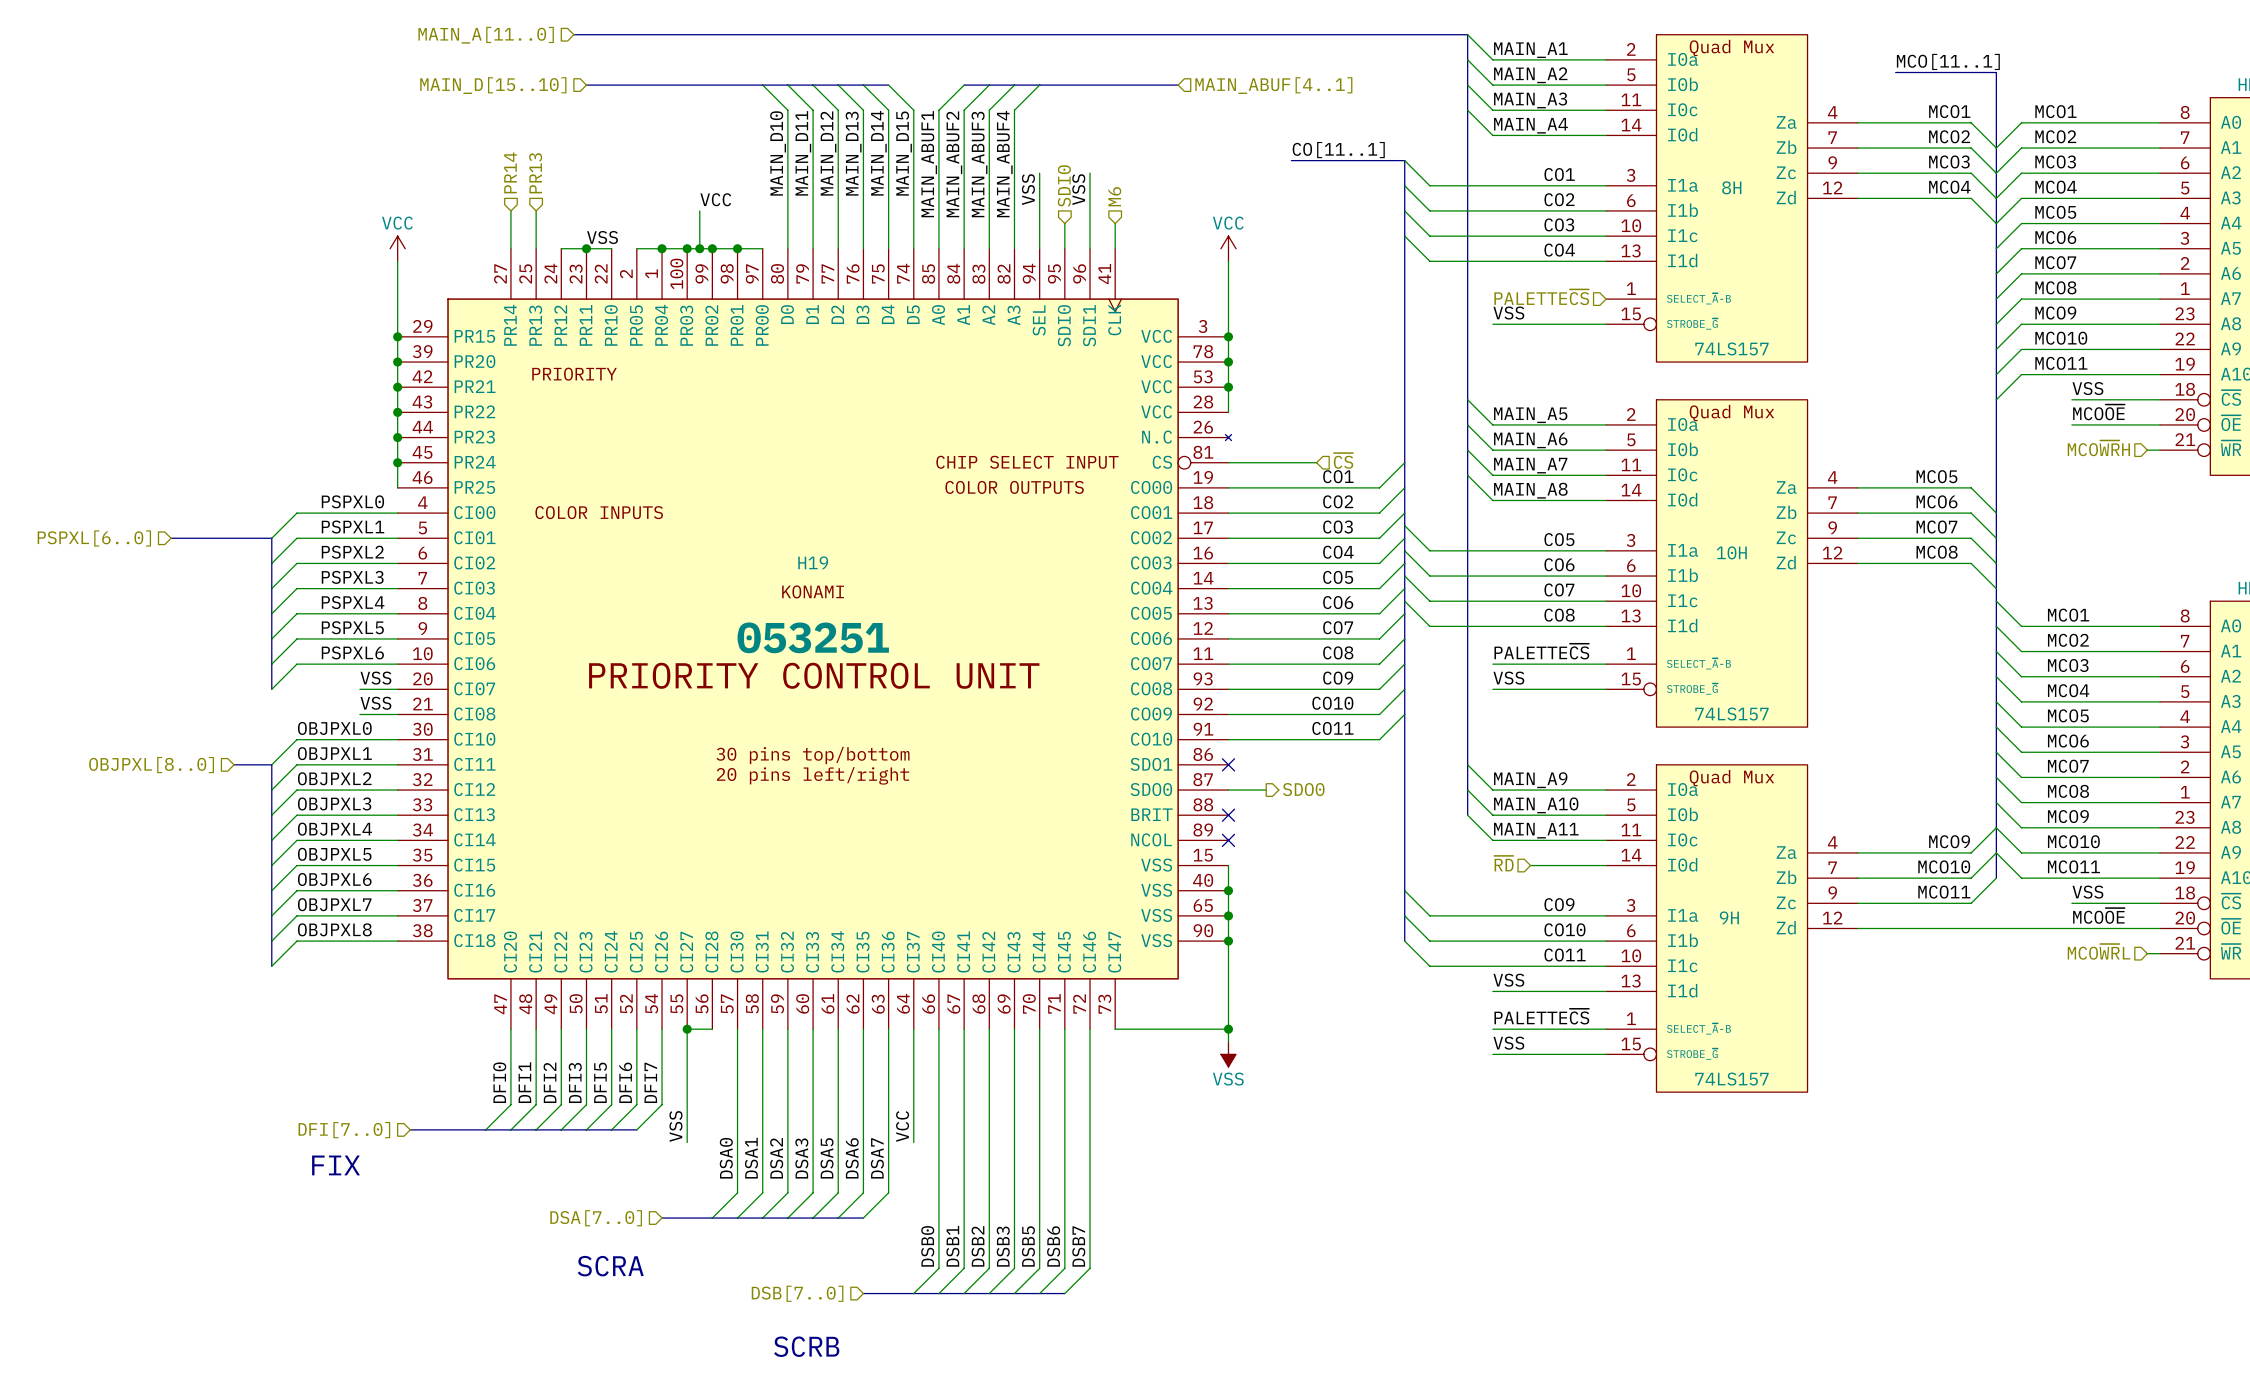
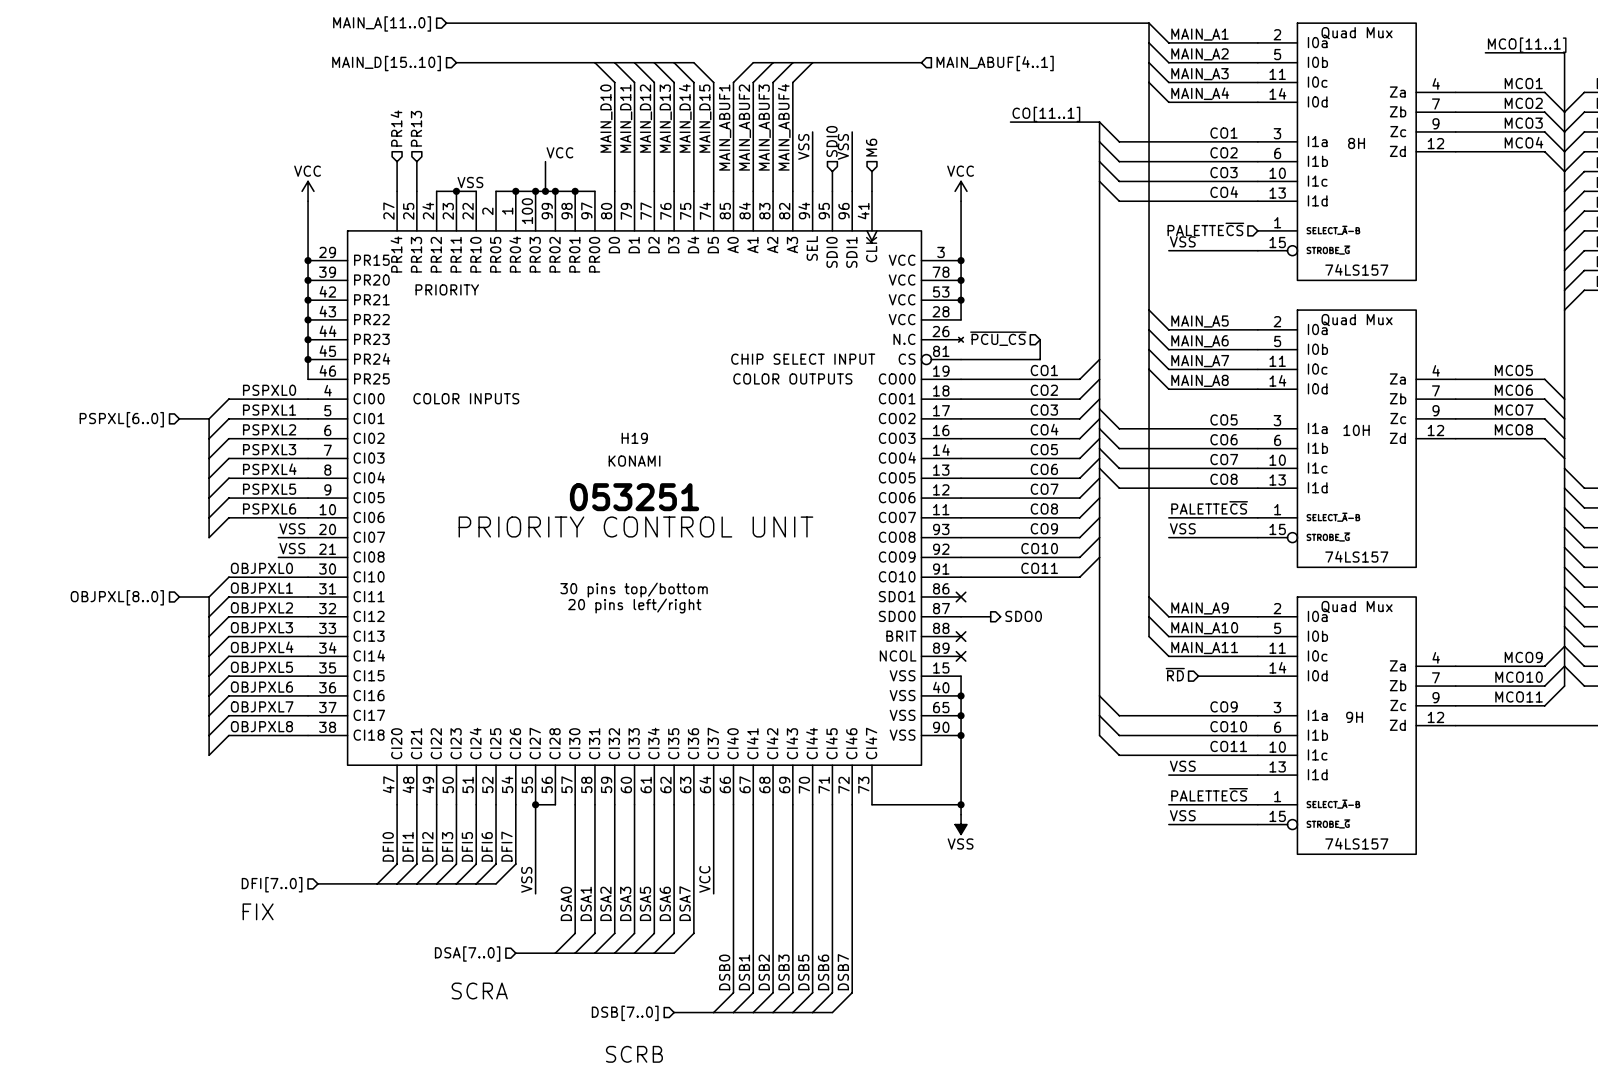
hierarchical label: none -> ~{PCU_CS} (998, 338)
wire: none -> (1040, 339) (1040, 359) (1030, 359)
hierarchical label: ~{CS} (1343, 460) -> none
hierarchical label position: PSPXL[6..0] (94, 538) -> PSPXL[6..0] (121, 419)
bus: (171, 538) (234, 538) -> none

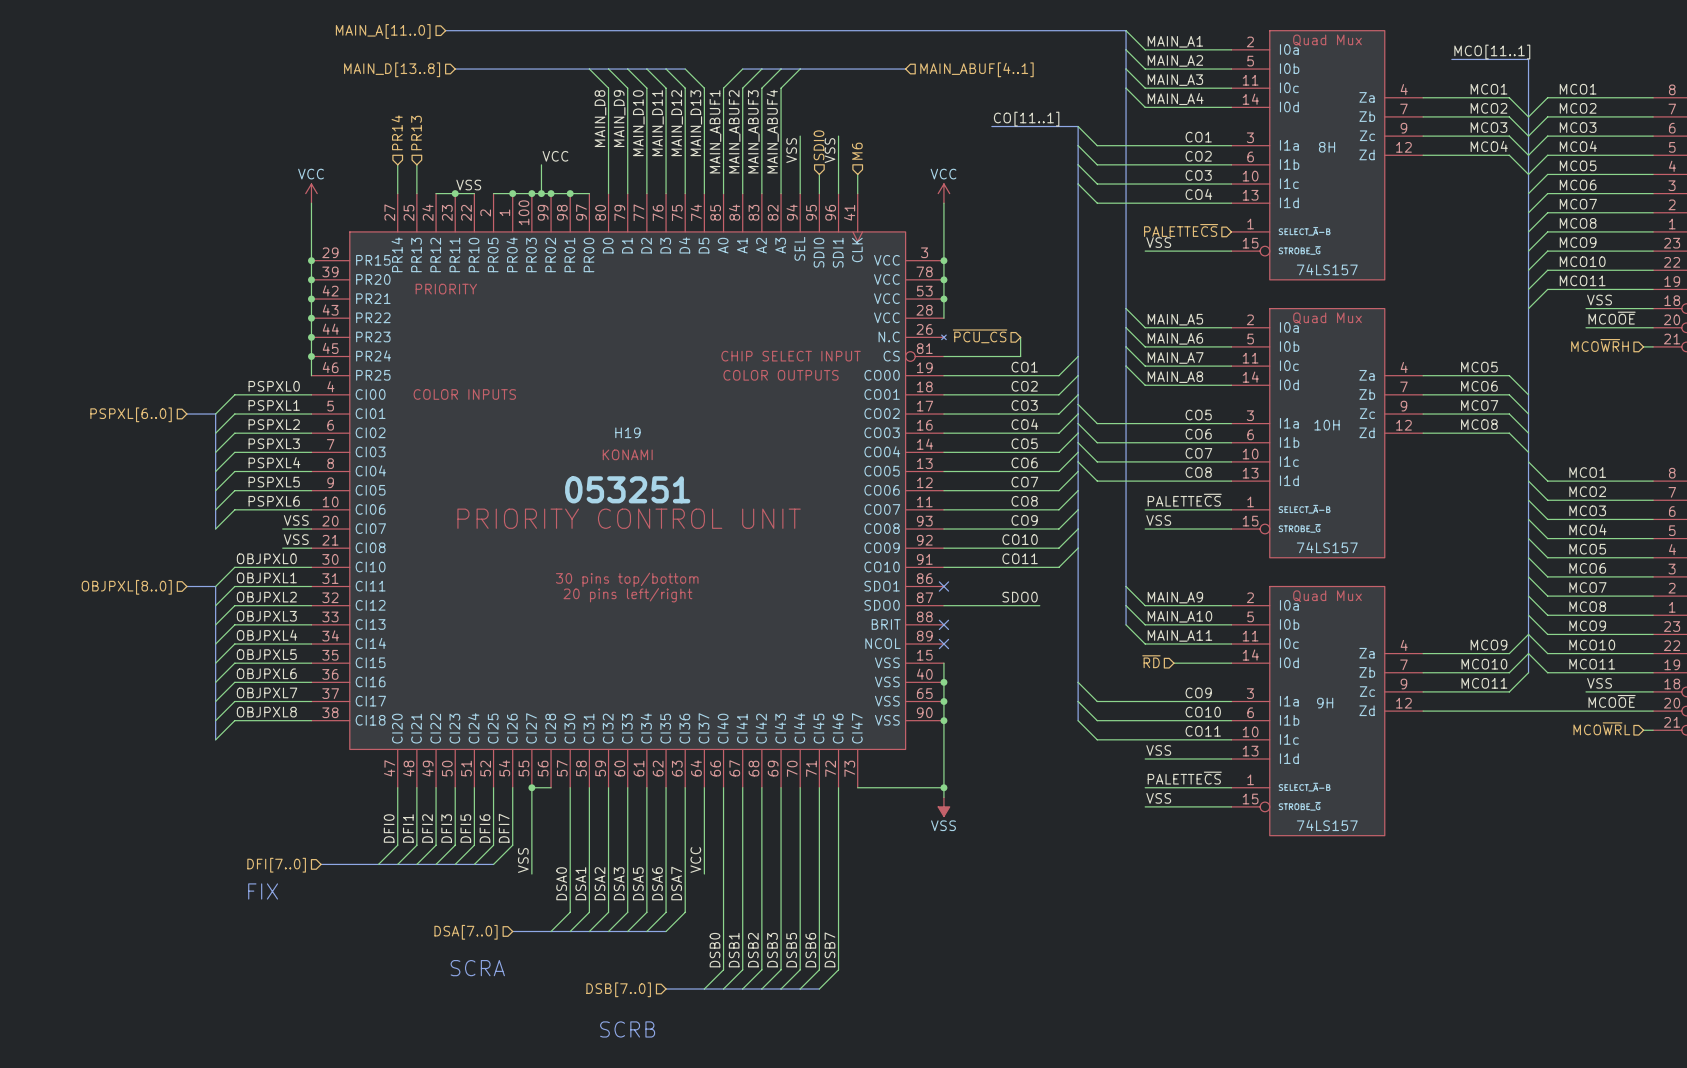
hierarchical label: MAIN_D[15..10] (386, 63) -> MAIN_D[13..8] (392, 69)
label: MAIN_D10 (606, 118) -> MAIN_D8 (600, 118)
label: MAIN_D11 (626, 118) -> MAIN_D9 (619, 118)
label: MAIN_D12 (645, 118) -> MAIN_D10 (638, 123)
label: MAIN_D13 (665, 118) -> MAIN_D11 (657, 123)
label: MAIN_D14 (685, 118) -> MAIN_D12 (677, 123)
label: MAIN_D15 (705, 118) -> MAIN_D13 (696, 123)
label: none -> SDO0 (1020, 597)
wire: none -> (972, 605) (1039, 605)
hierarchical label: SDO0 (1023, 616) -> none

